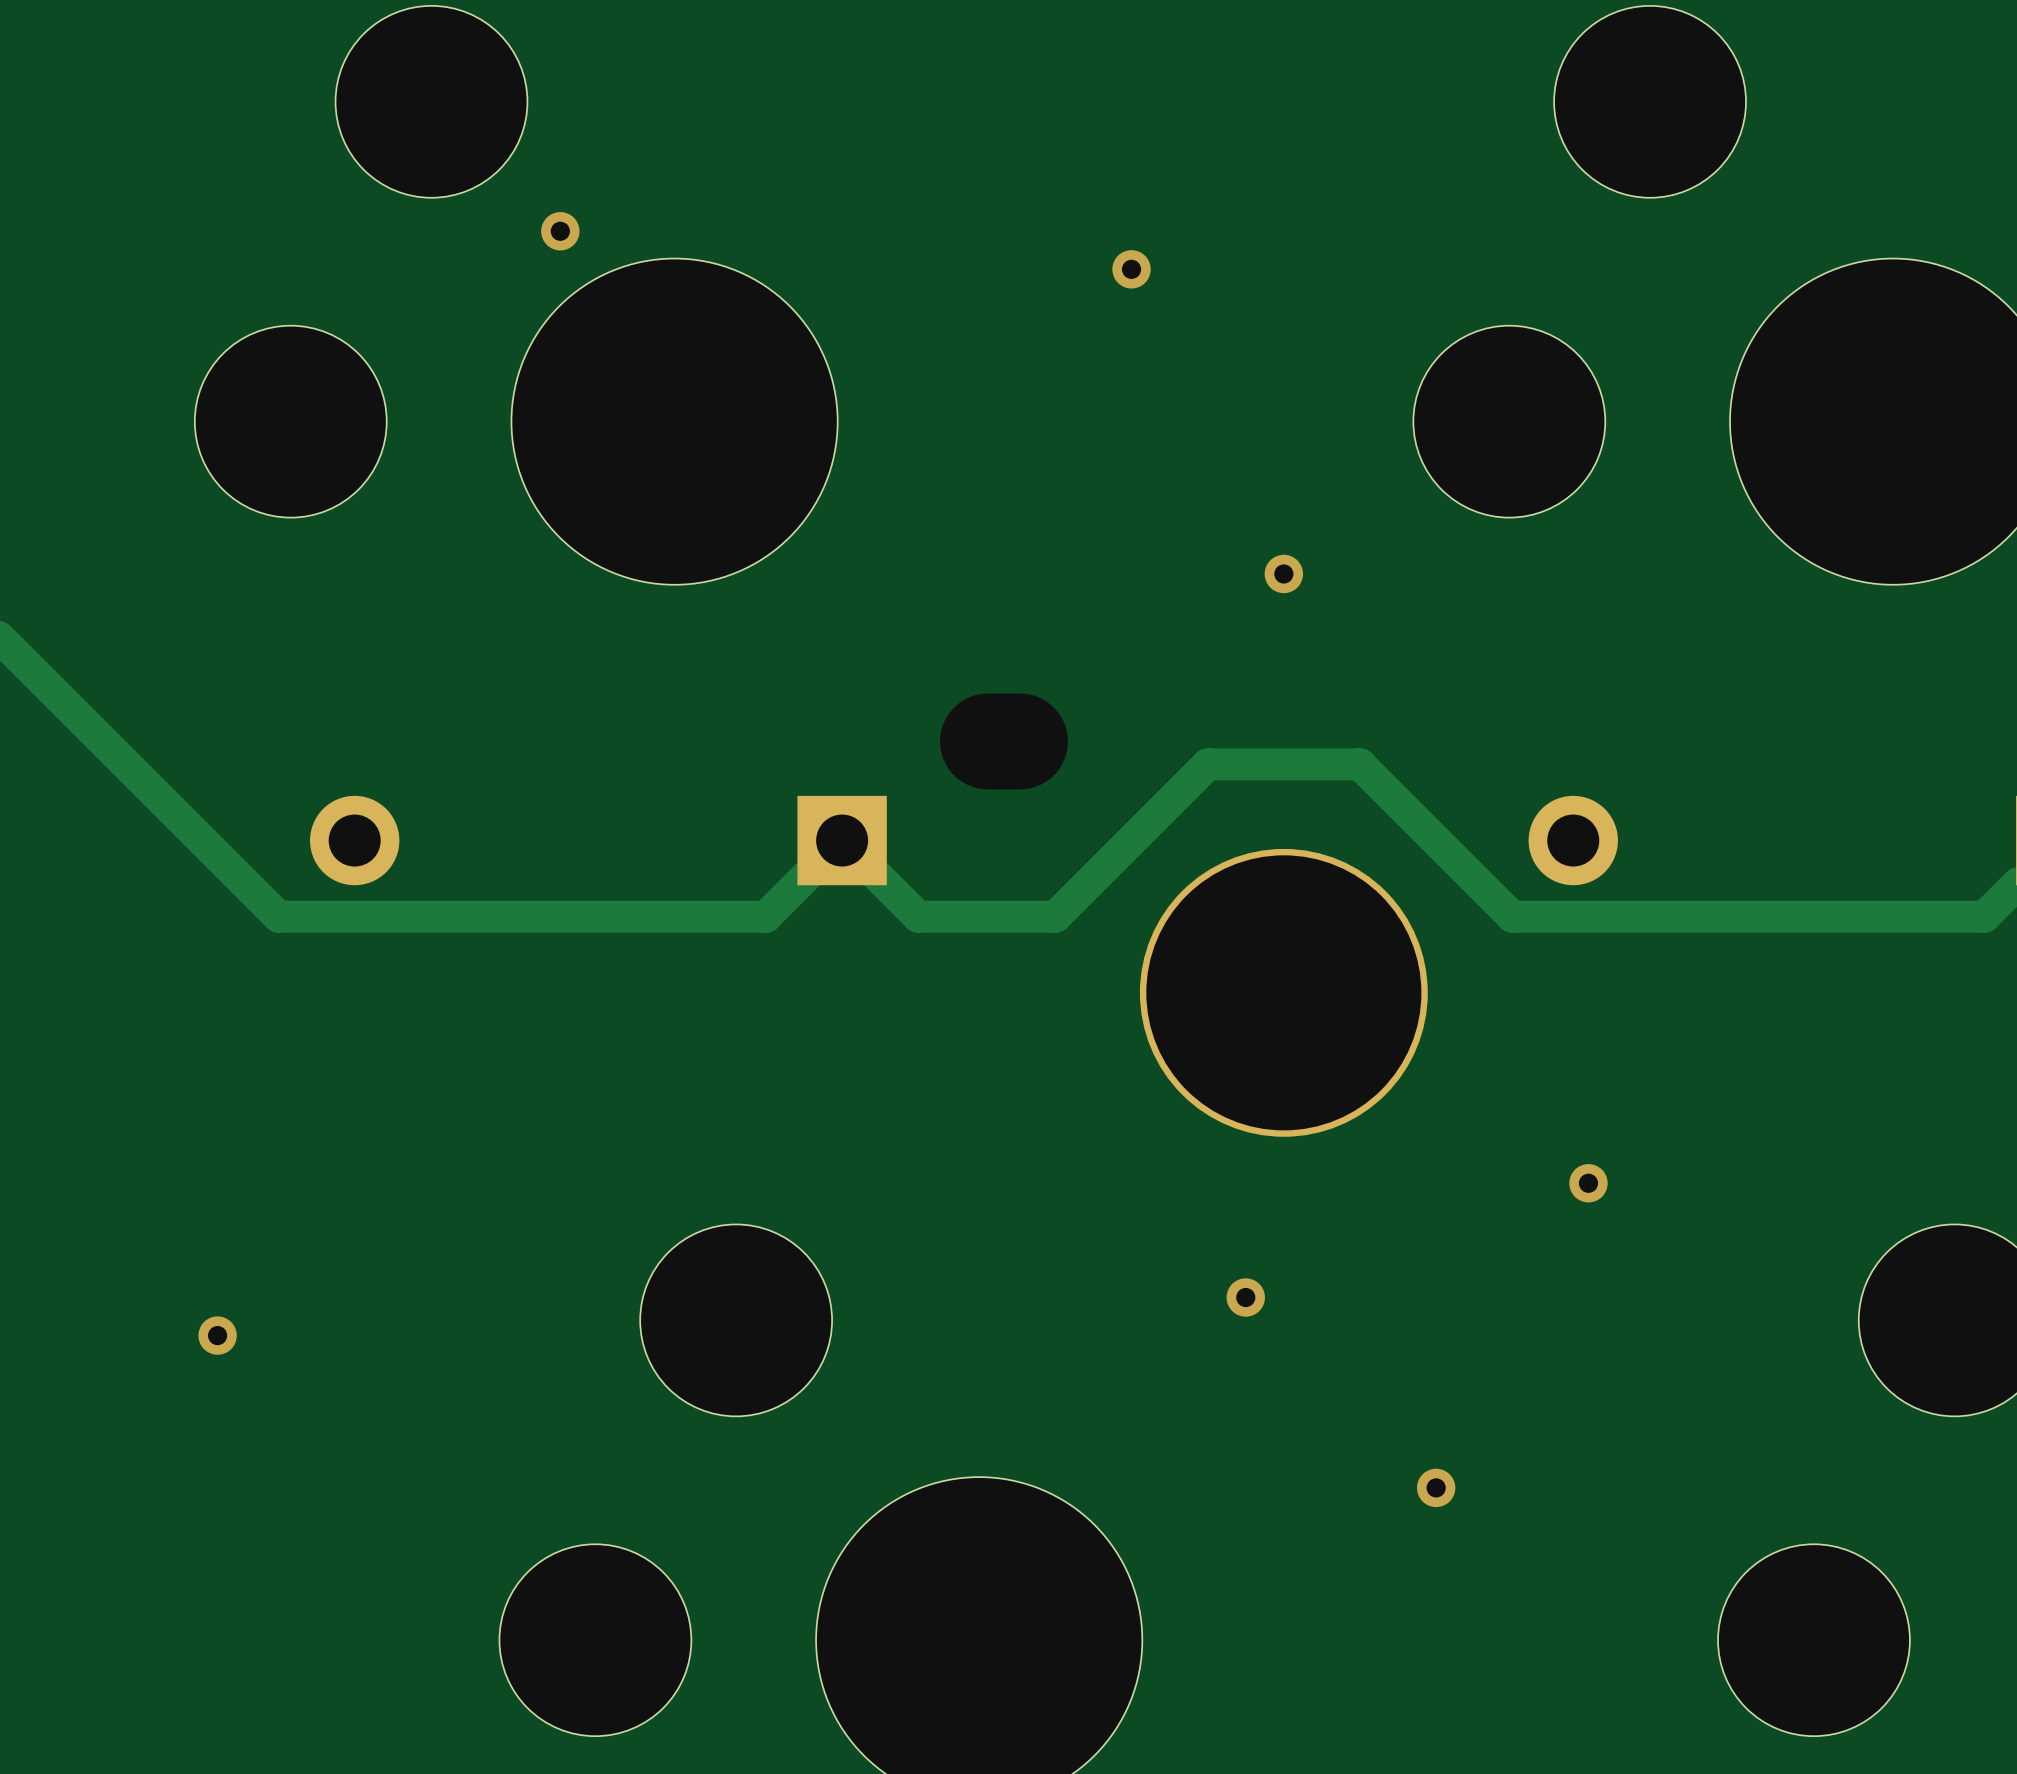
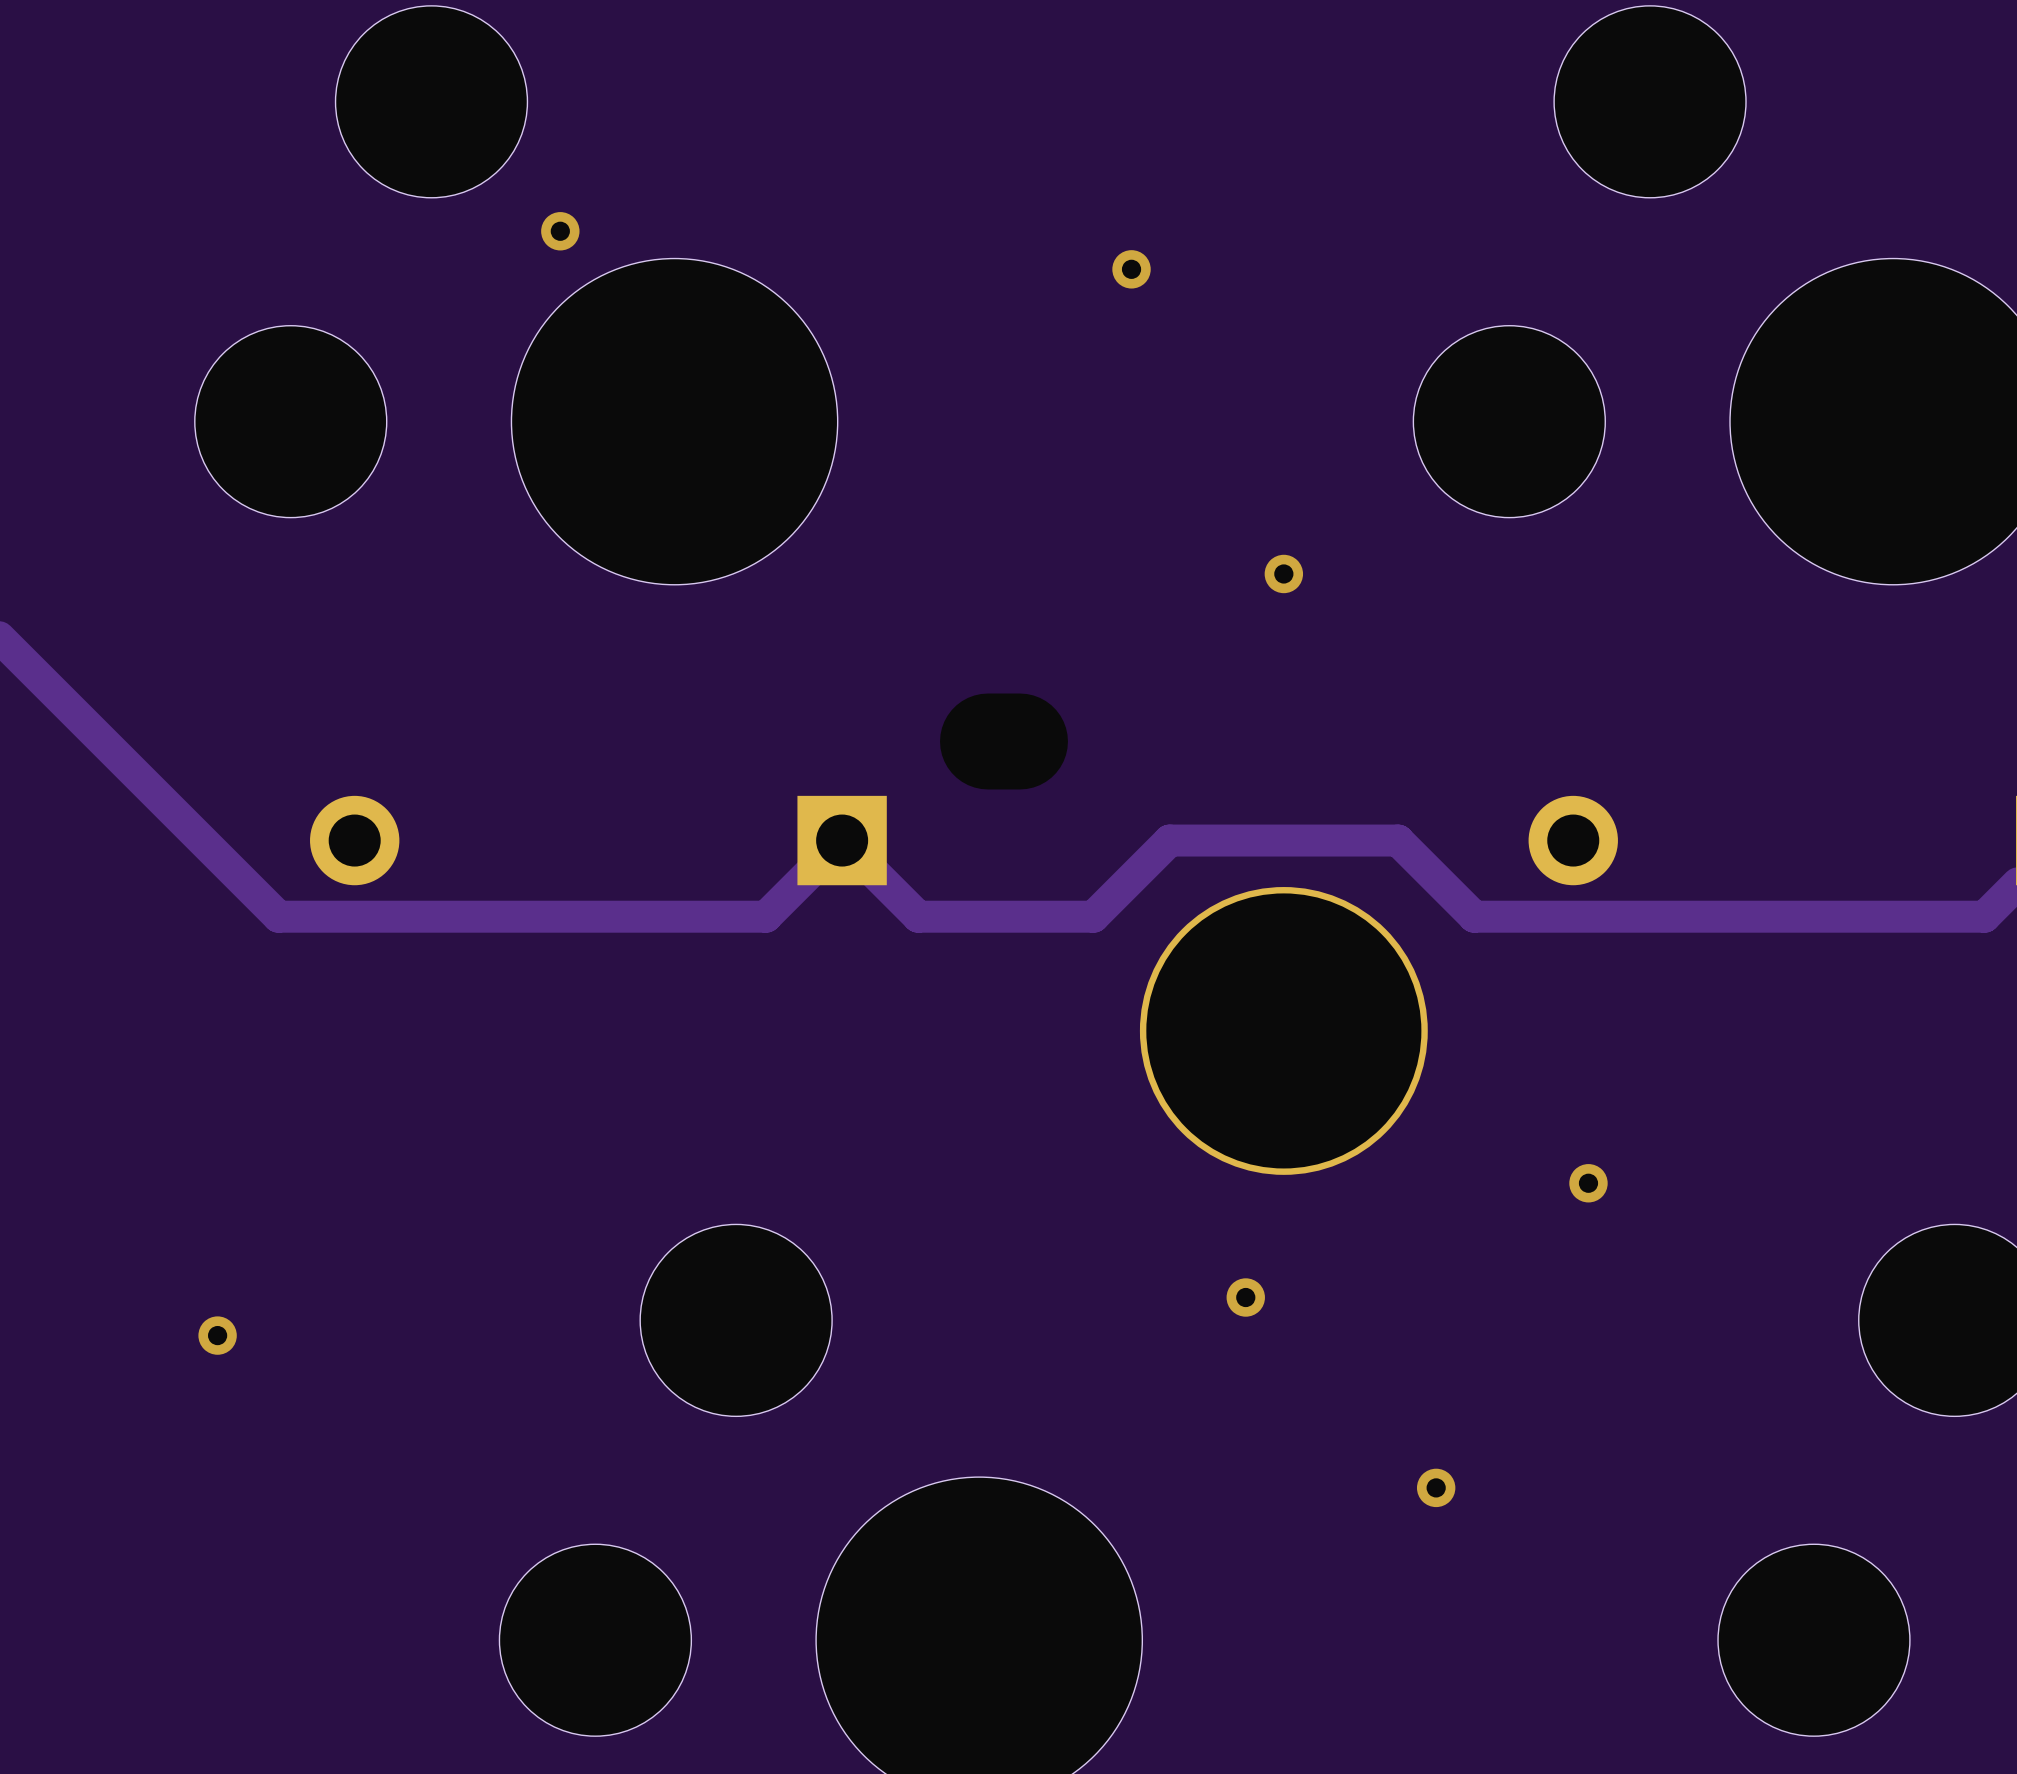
track: (1055, 916) (1207, 764) (1360, 764) (1512, 916) -> (1055, 916) (1093, 916) (1169, 840) (1398, 840) (1474, 916) (1512, 916)
part position: (1283, 992) -> (1283, 1030)

